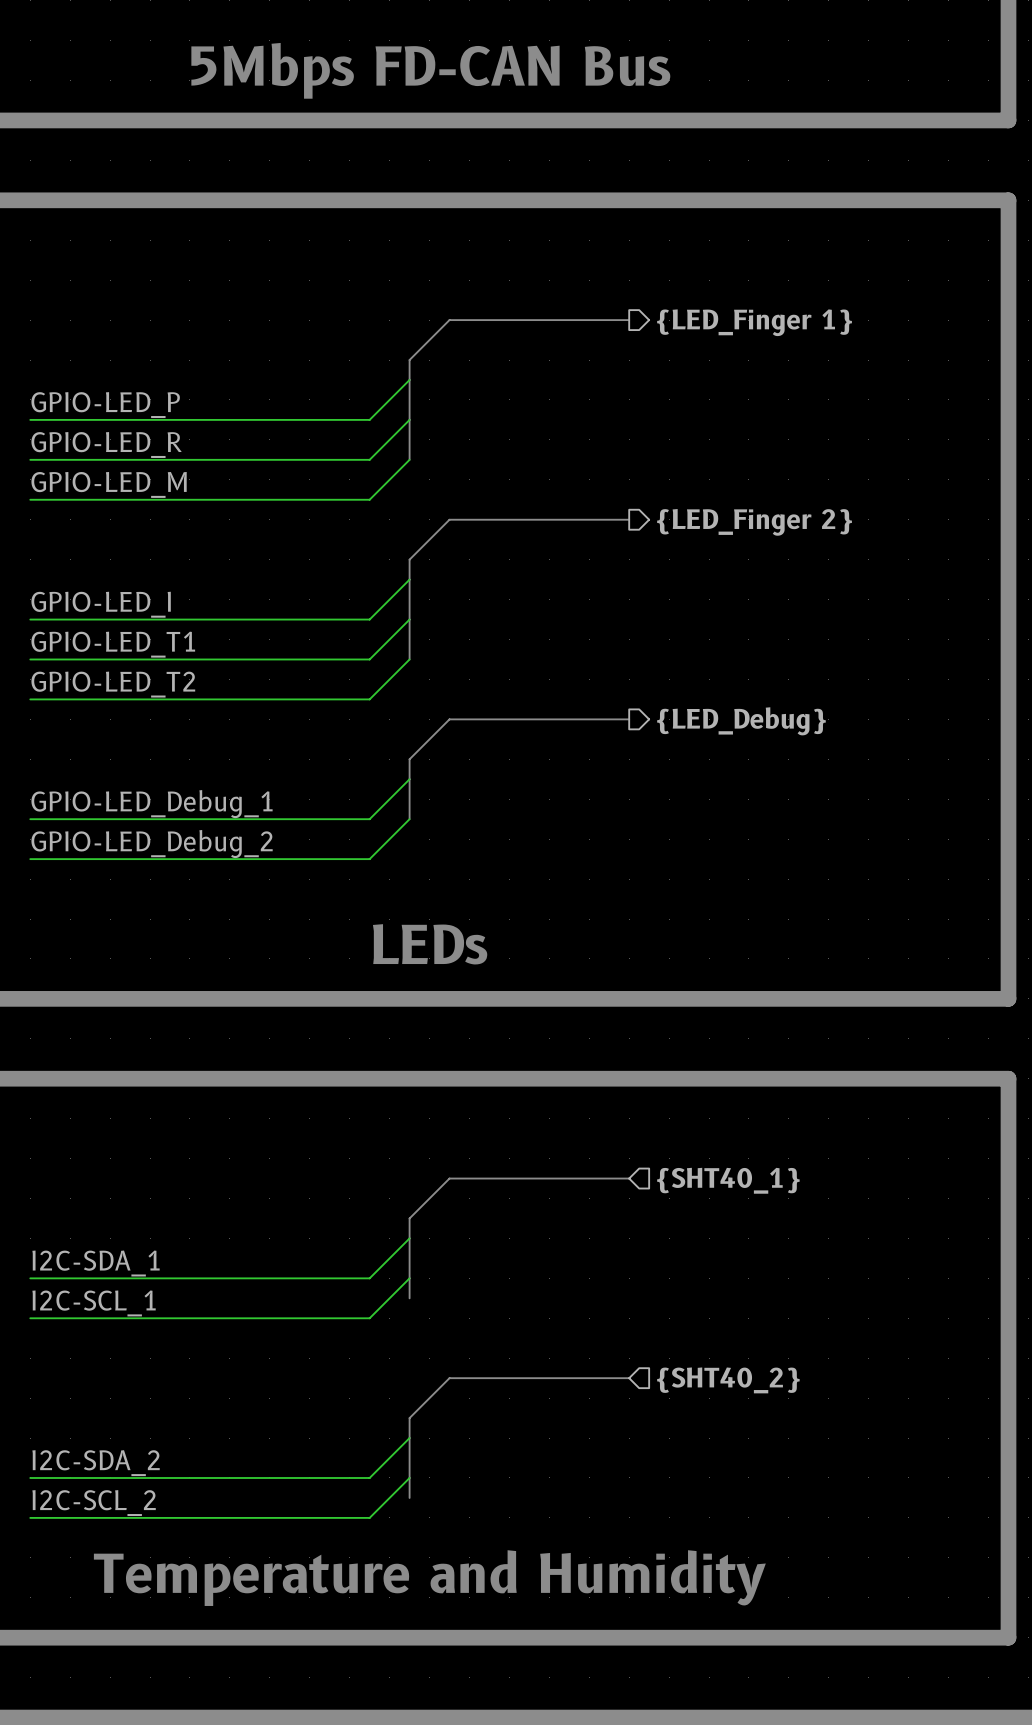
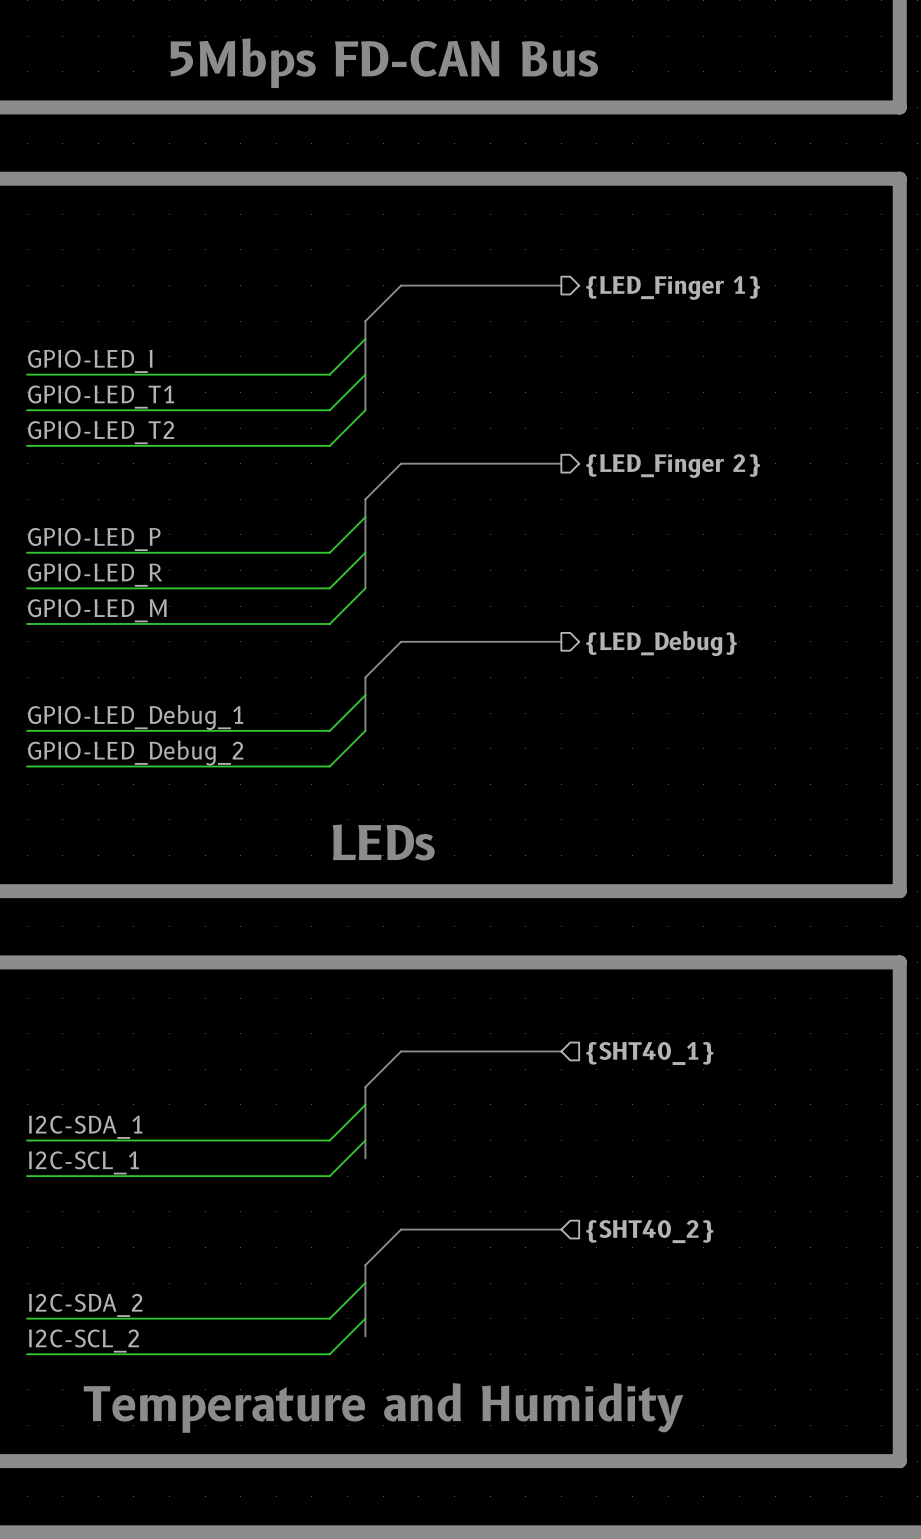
label: GPIO-LED_P (105, 405) -> GPIO-LED_I (90, 361)
label: GPIO-LED_R (106, 445) -> GPIO-LED_T1 (101, 397)
label: GPIO-LED_M (109, 484) -> GPIO-LED_T2 (101, 432)
label: GPIO-LED_I (101, 604) -> GPIO-LED_P (94, 539)
label: GPIO-LED_T1 (113, 644) -> GPIO-LED_R (95, 575)
label: GPIO-LED_T2 (113, 684) -> GPIO-LED_M (97, 610)

